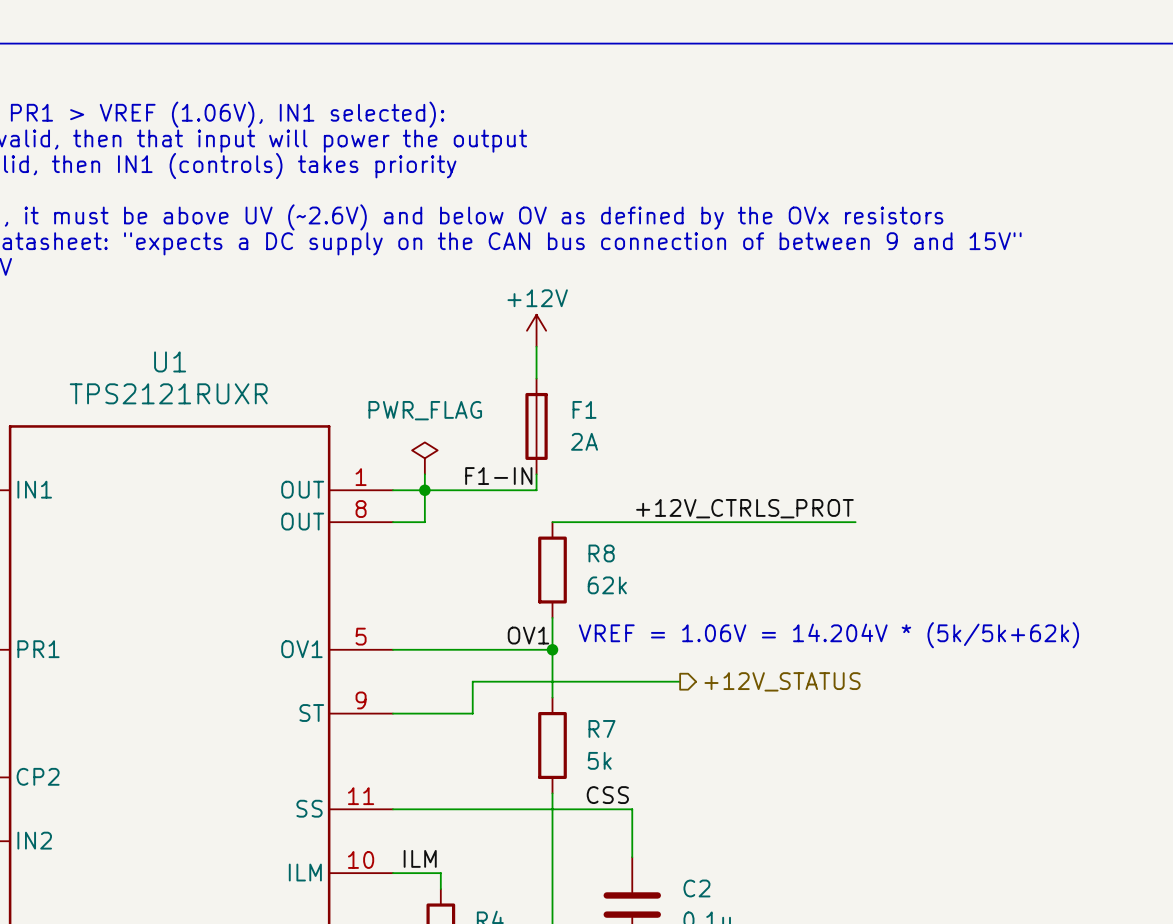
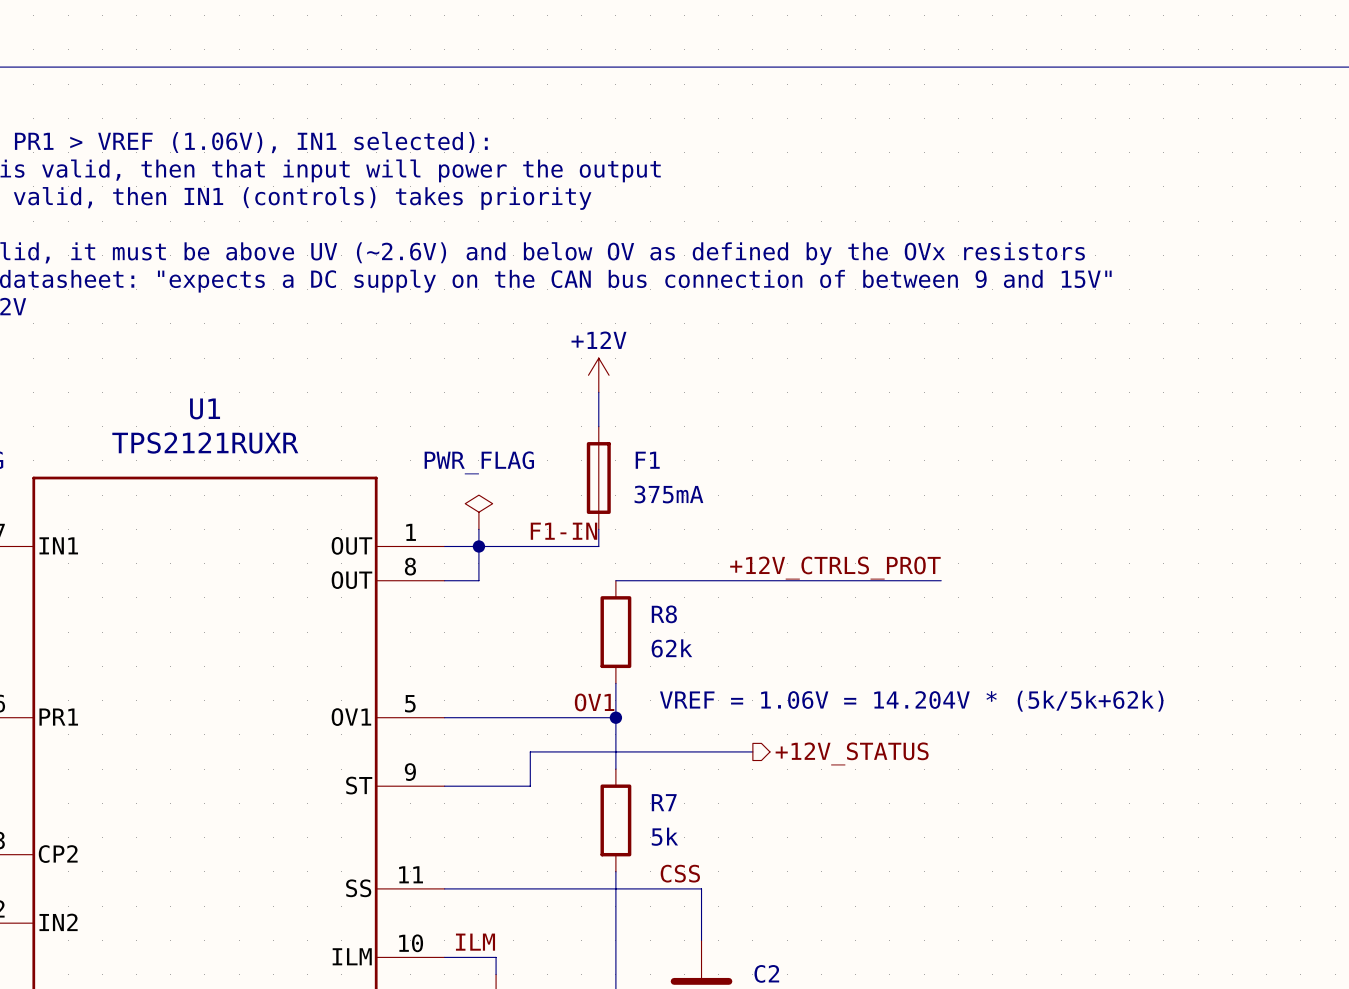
F1 value: 2A (584, 441) -> 375mA (668, 494)

